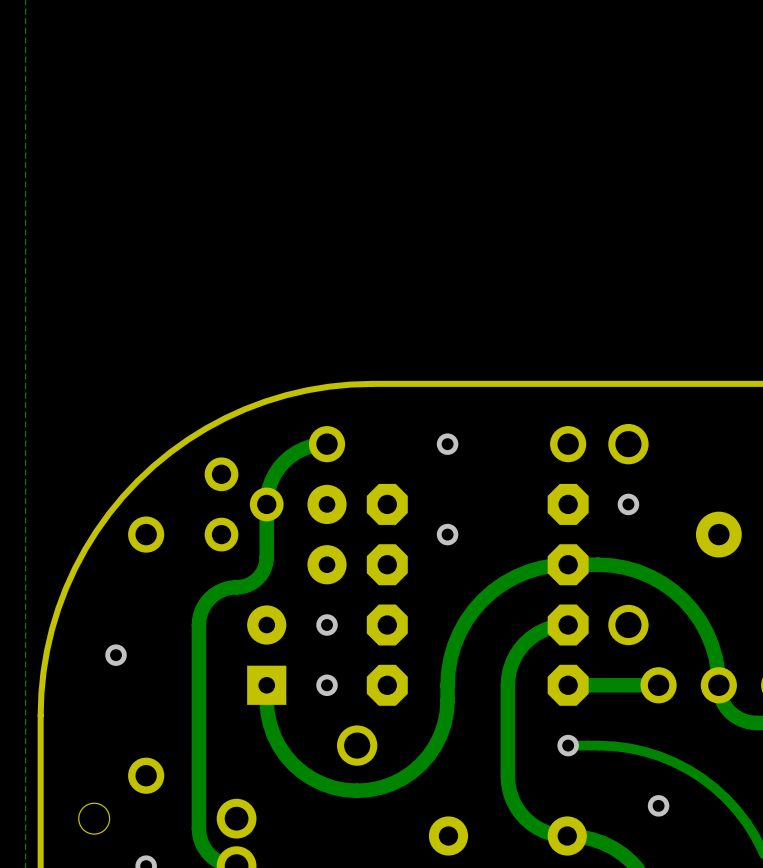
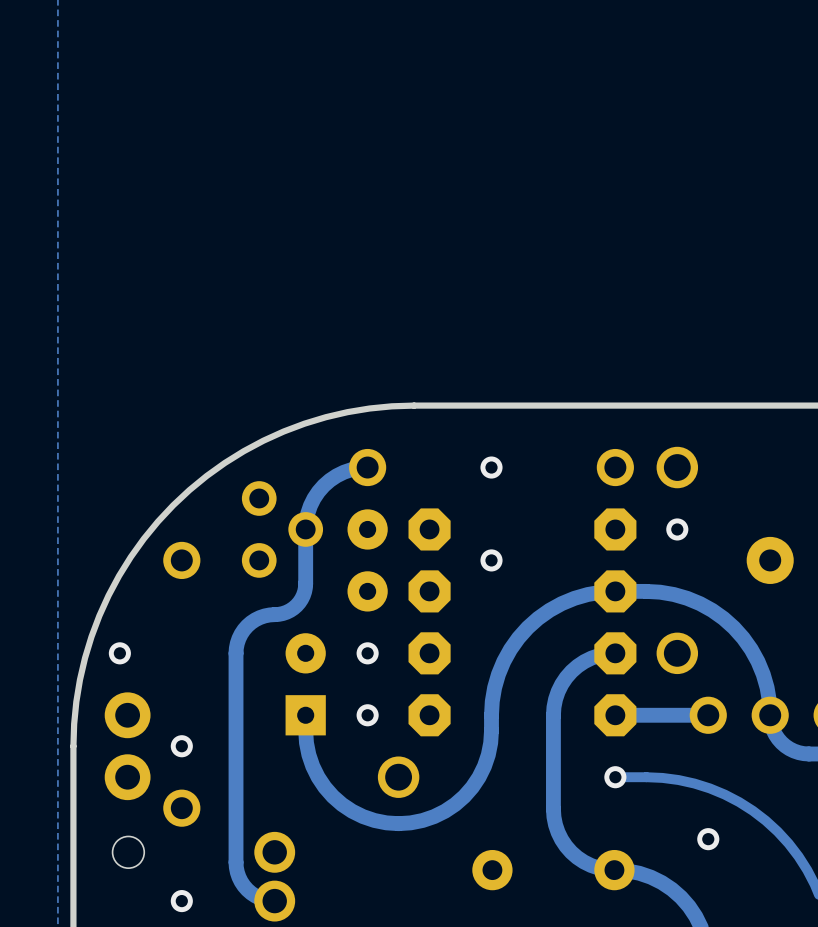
via: none -> (119, 653)
via: (116, 655) -> none
part: none -> (127, 746)
via: none -> (181, 746)

